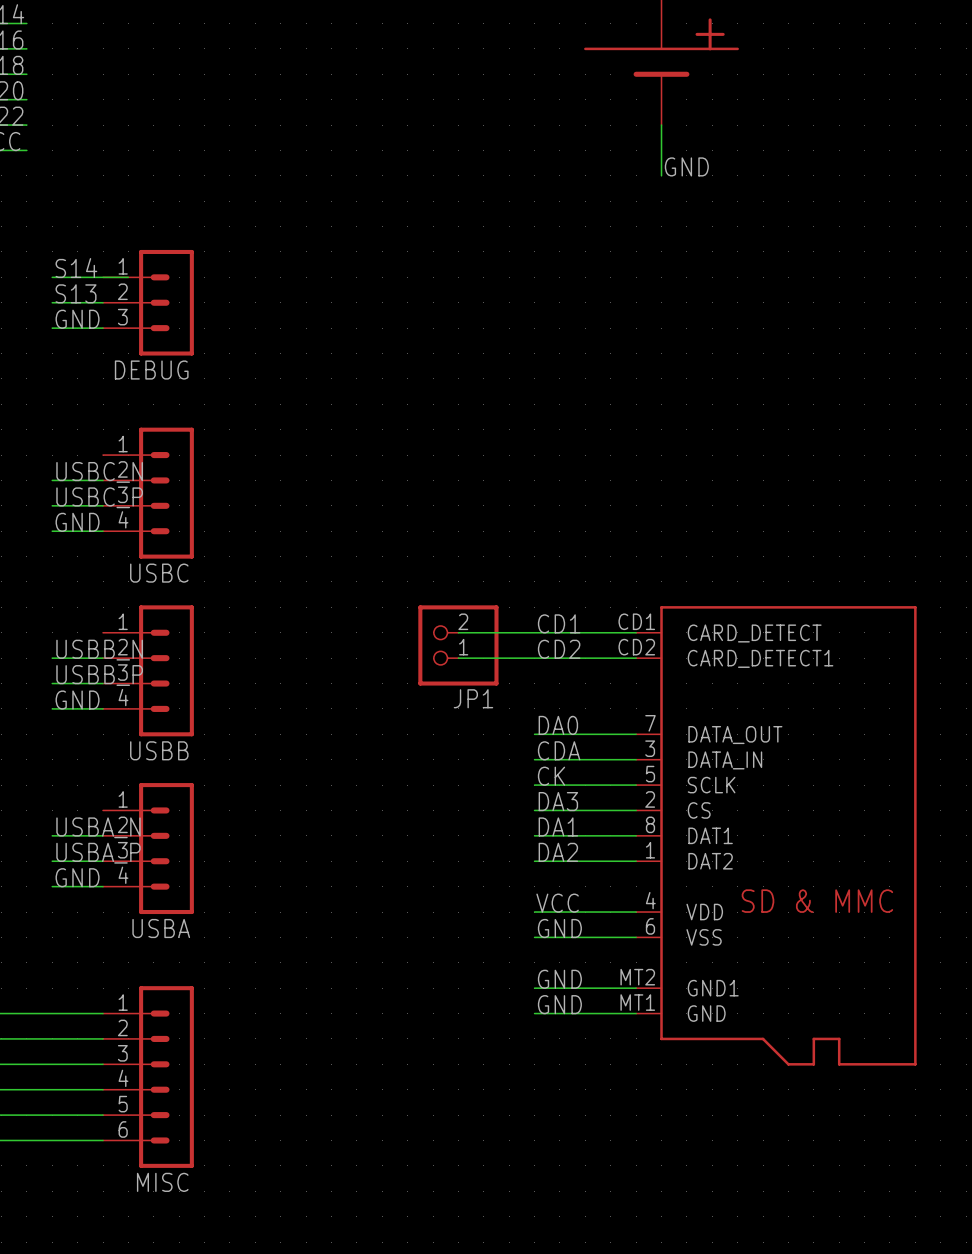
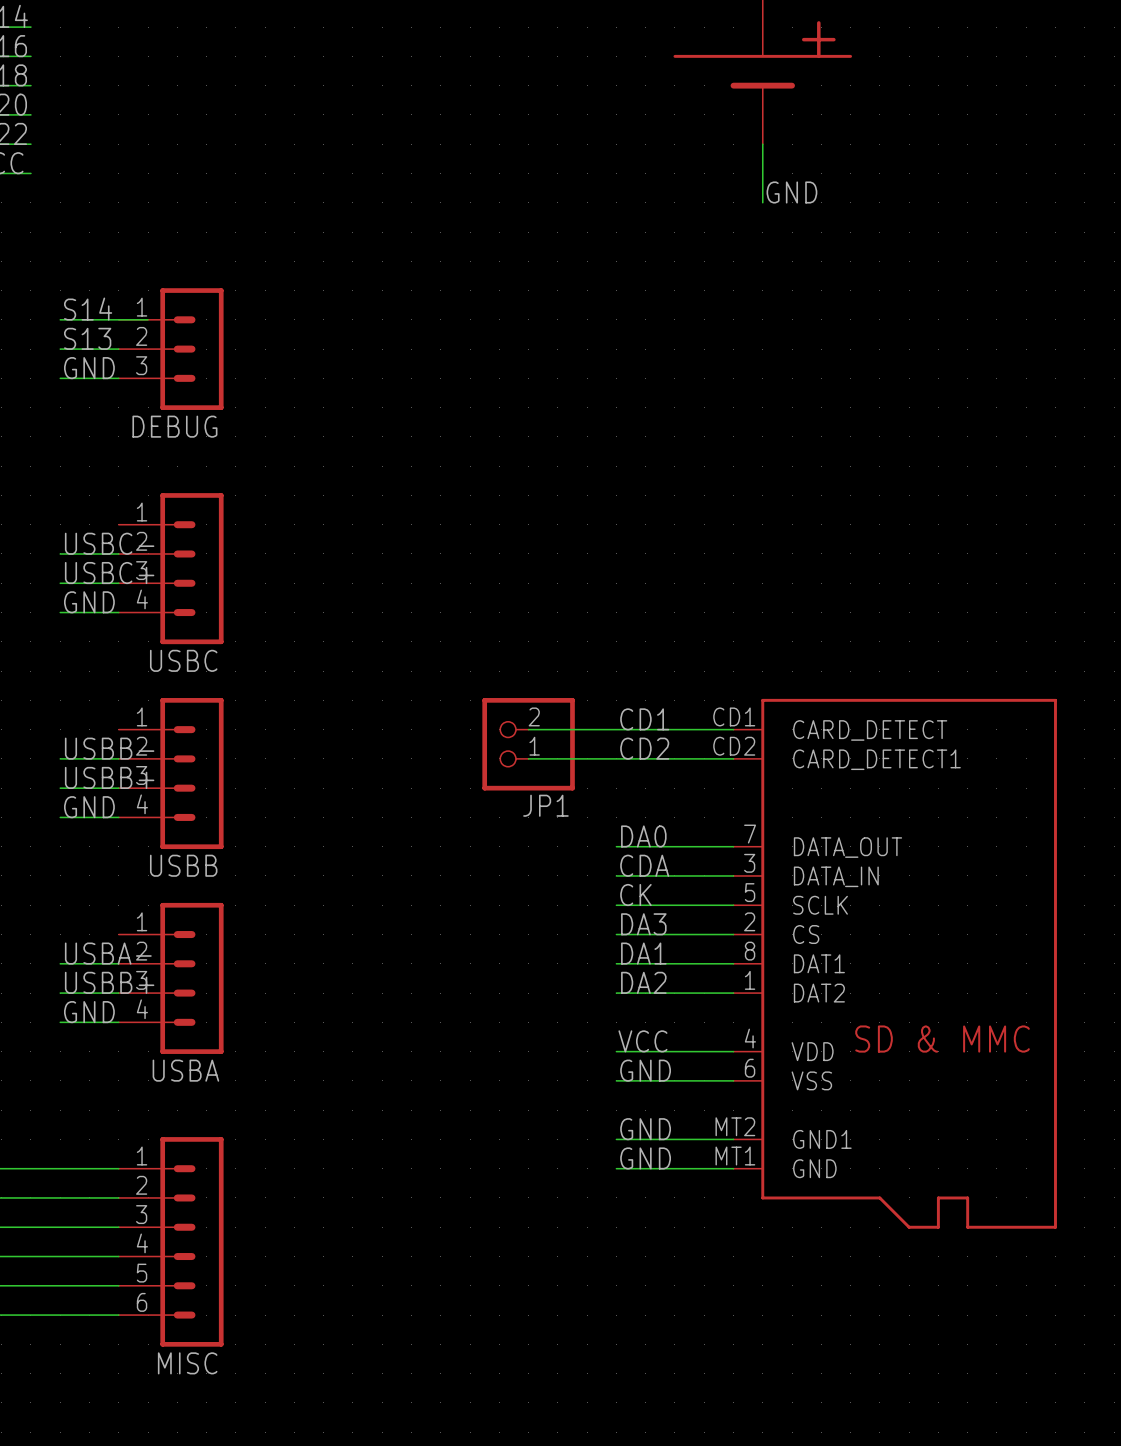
label: USBC_N (99, 472) -> USBC- (109, 543)
label: USBC_P (99, 497) -> USBC+ (109, 573)
label: USBB_N (99, 650) -> USBB- (109, 748)
label: USBB_P (99, 675) -> USBB+ (109, 777)
label: USBA_N (98, 827) -> USBA- (108, 953)
label: USBA_P (98, 853) -> USBB+ (109, 982)

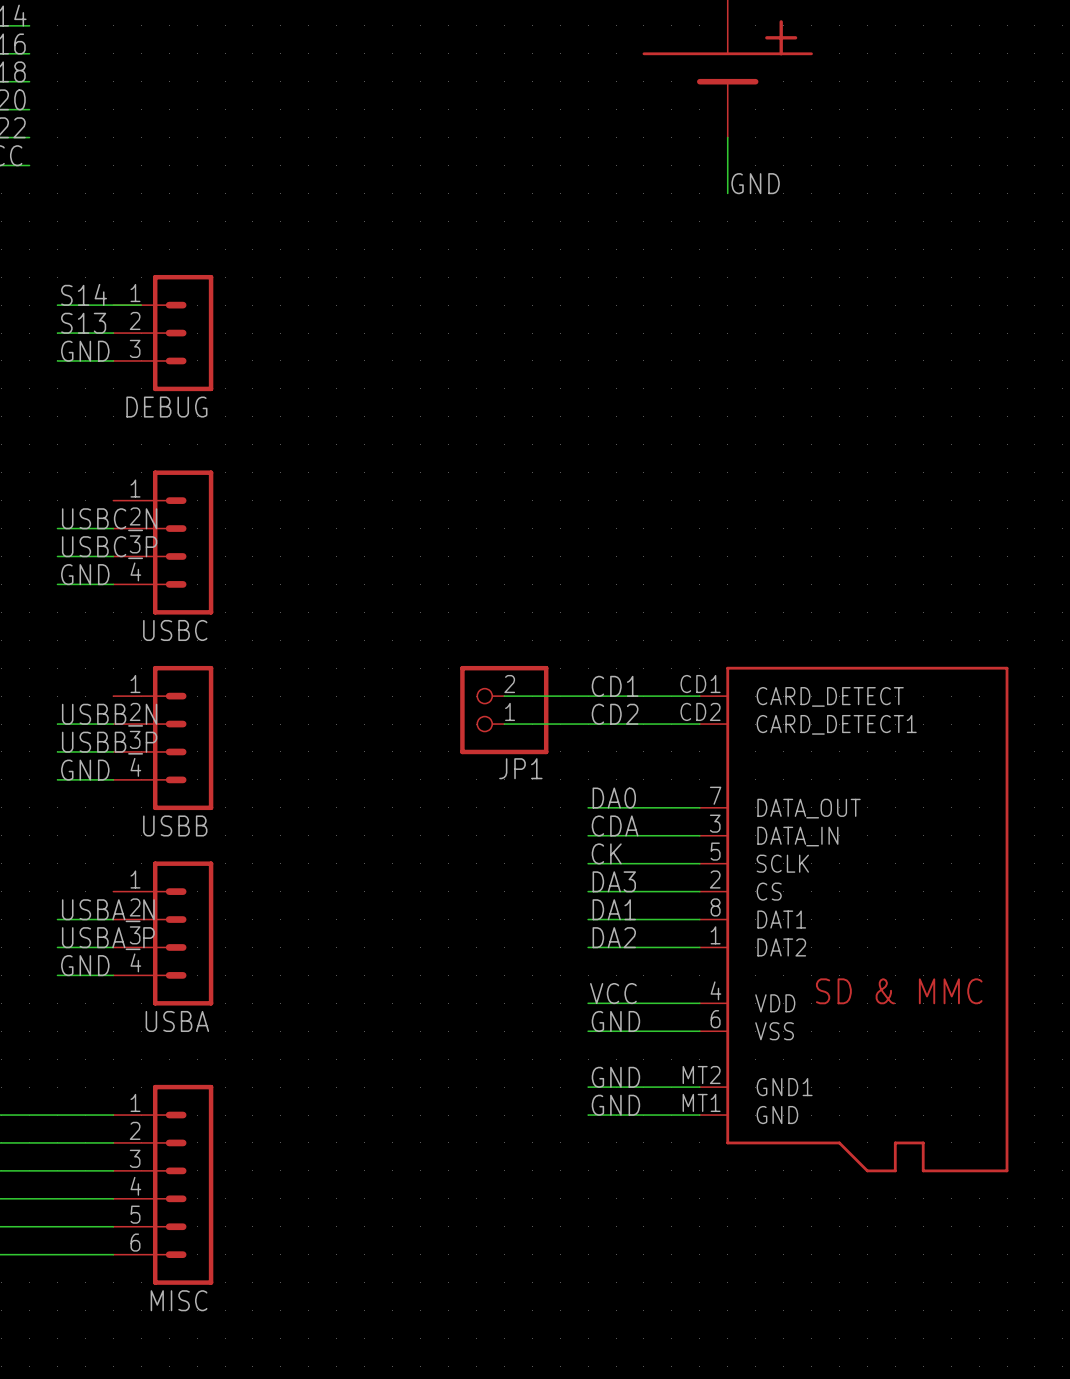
label: USBC- (109, 543) -> USBC_N (109, 519)
label: USBC+ (109, 573) -> USBC_P (109, 547)
label: USBB- (109, 748) -> USBB_N (109, 715)
label: USBB+ (109, 777) -> USBB_P (109, 743)
label: USBA- (108, 953) -> USBA_N (108, 910)
label: USBB+ (109, 982) -> USBA_P (108, 938)

